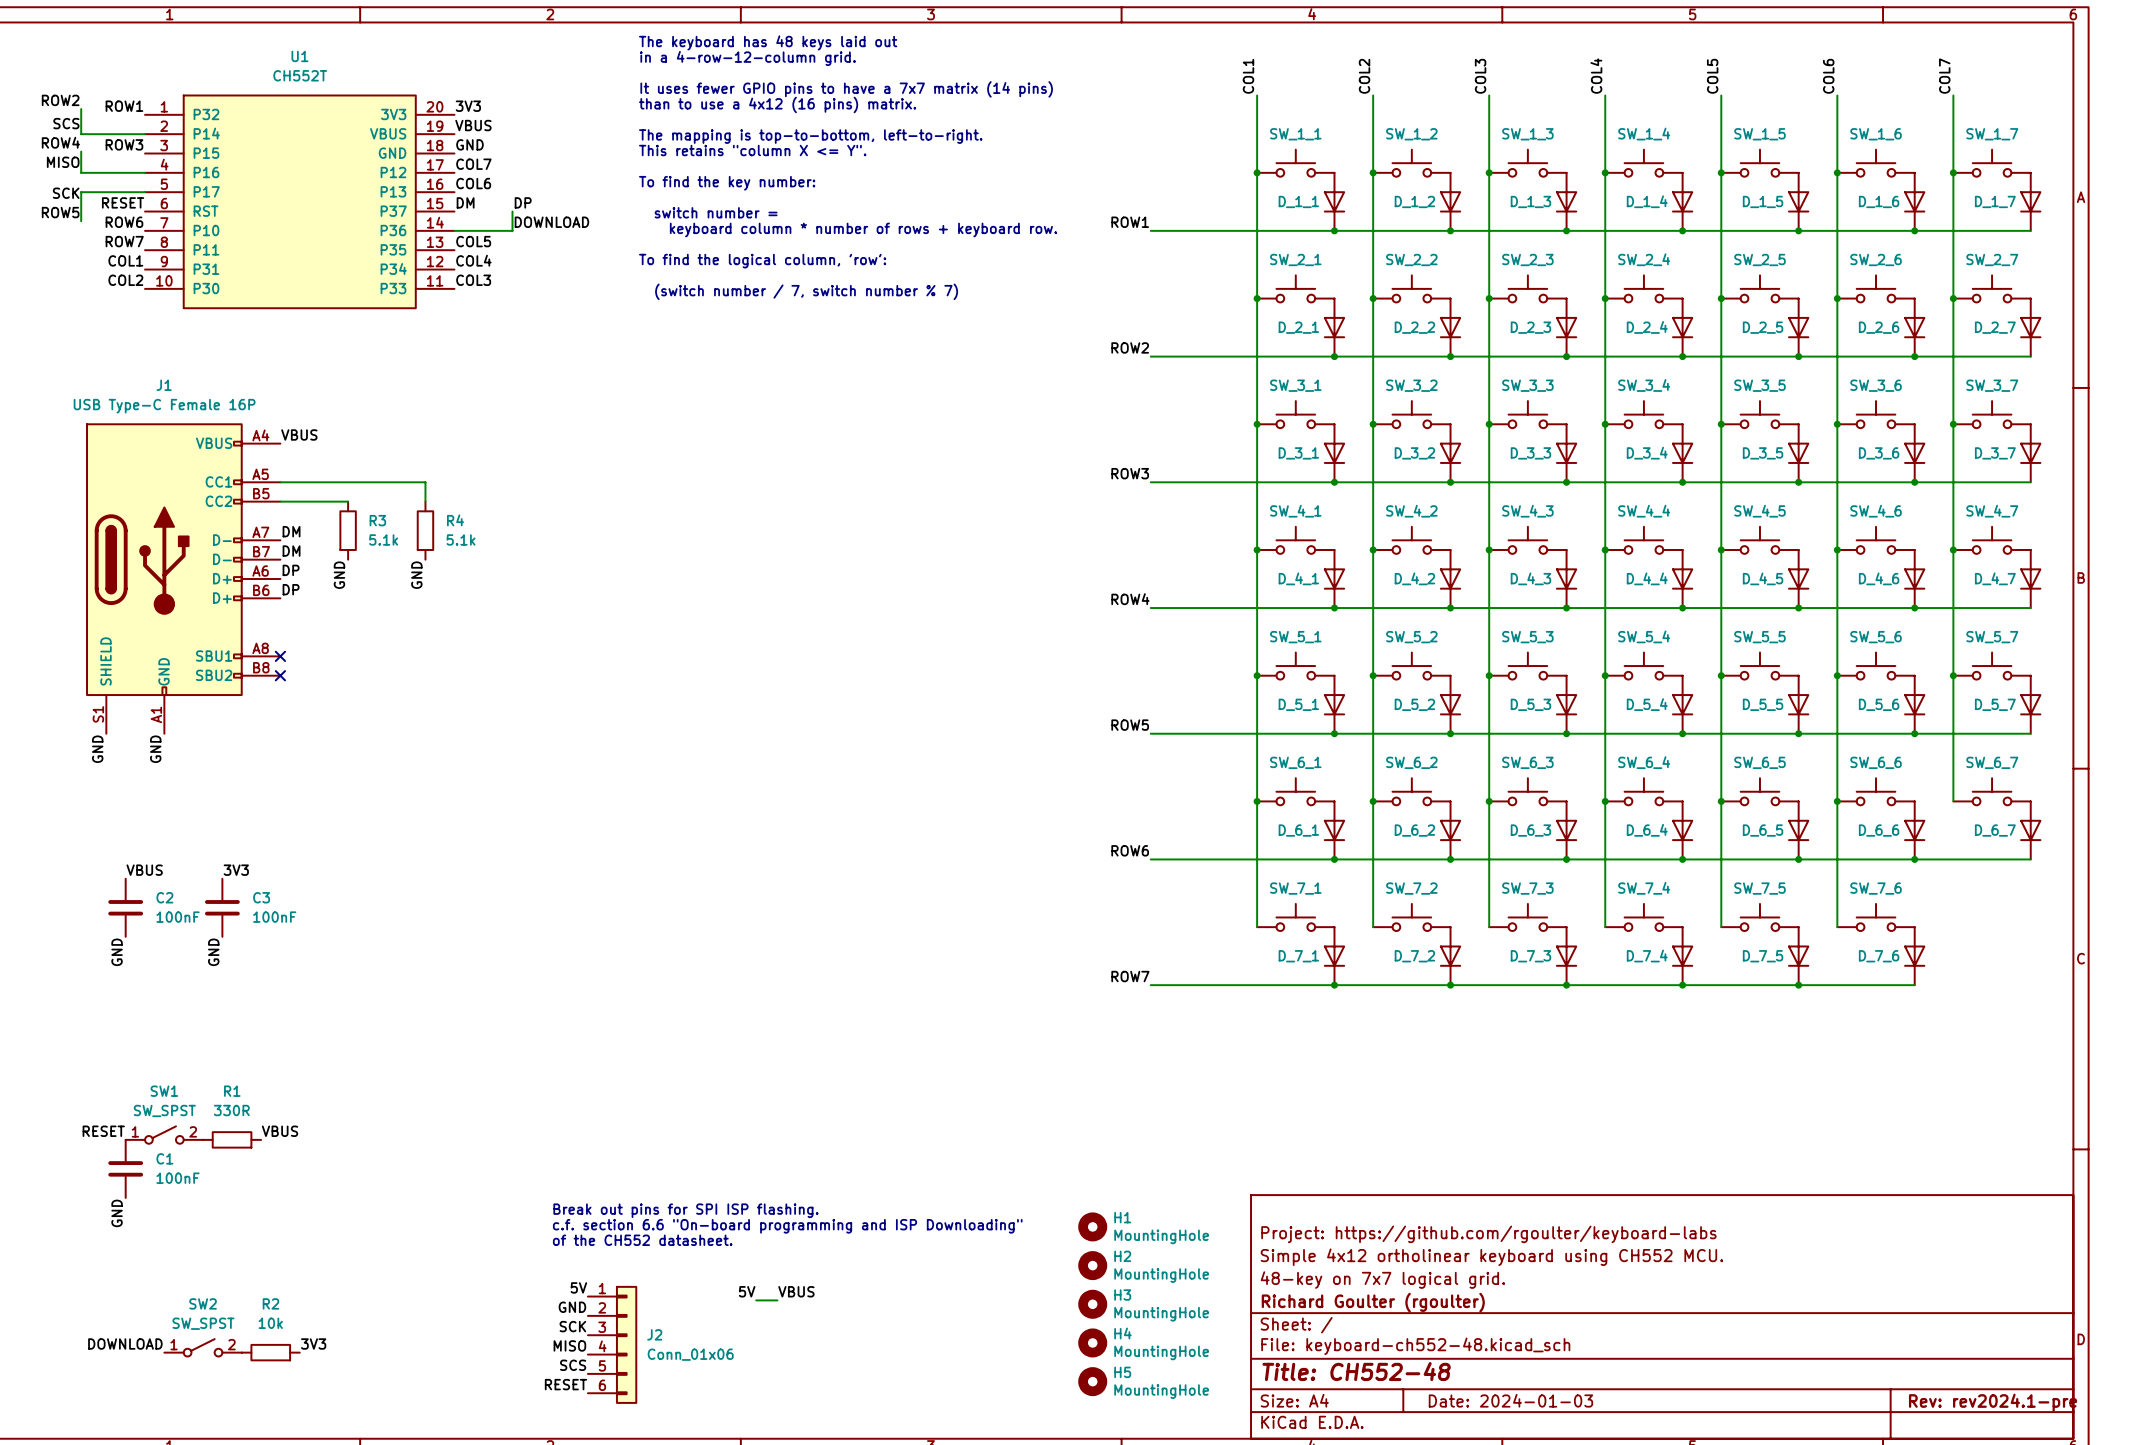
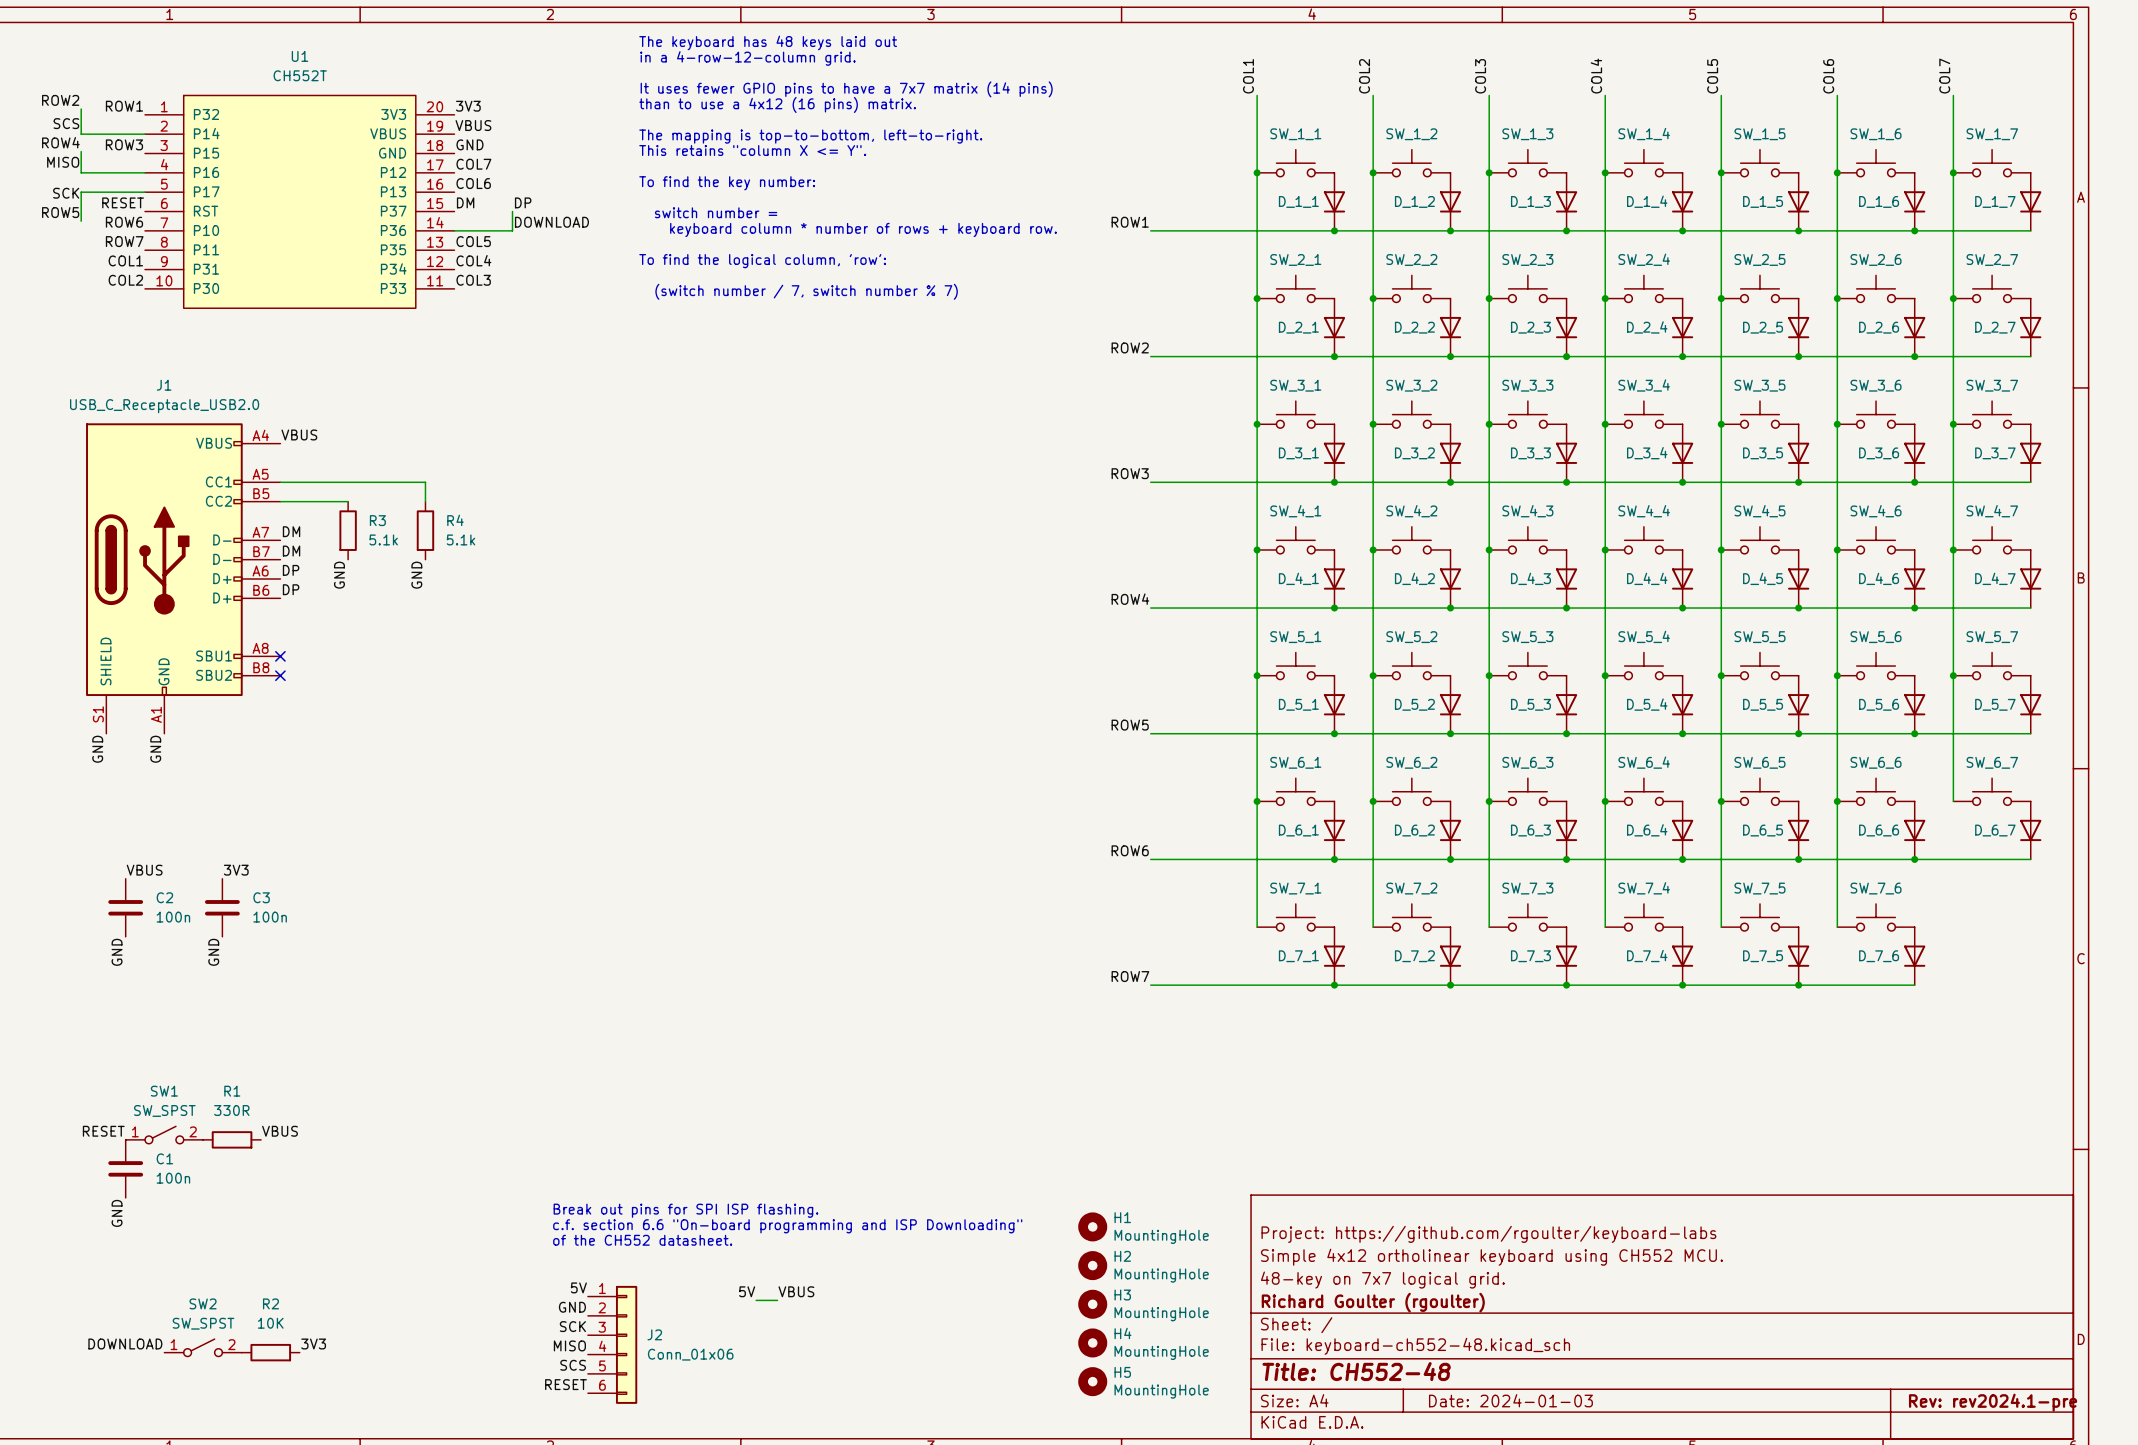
J1 value: USB Type-C Female 16P (164, 406) -> USB_C_Receptacle_USB2.0 (164, 406)
C2 value: 100nF (178, 917) -> 100n (173, 917)
C3 value: 100nF (274, 917) -> 100n (270, 917)
C1 value: 100nF (178, 1178) -> 100n (173, 1178)
R2 value: 10k (270, 1323) -> 10K (270, 1323)

